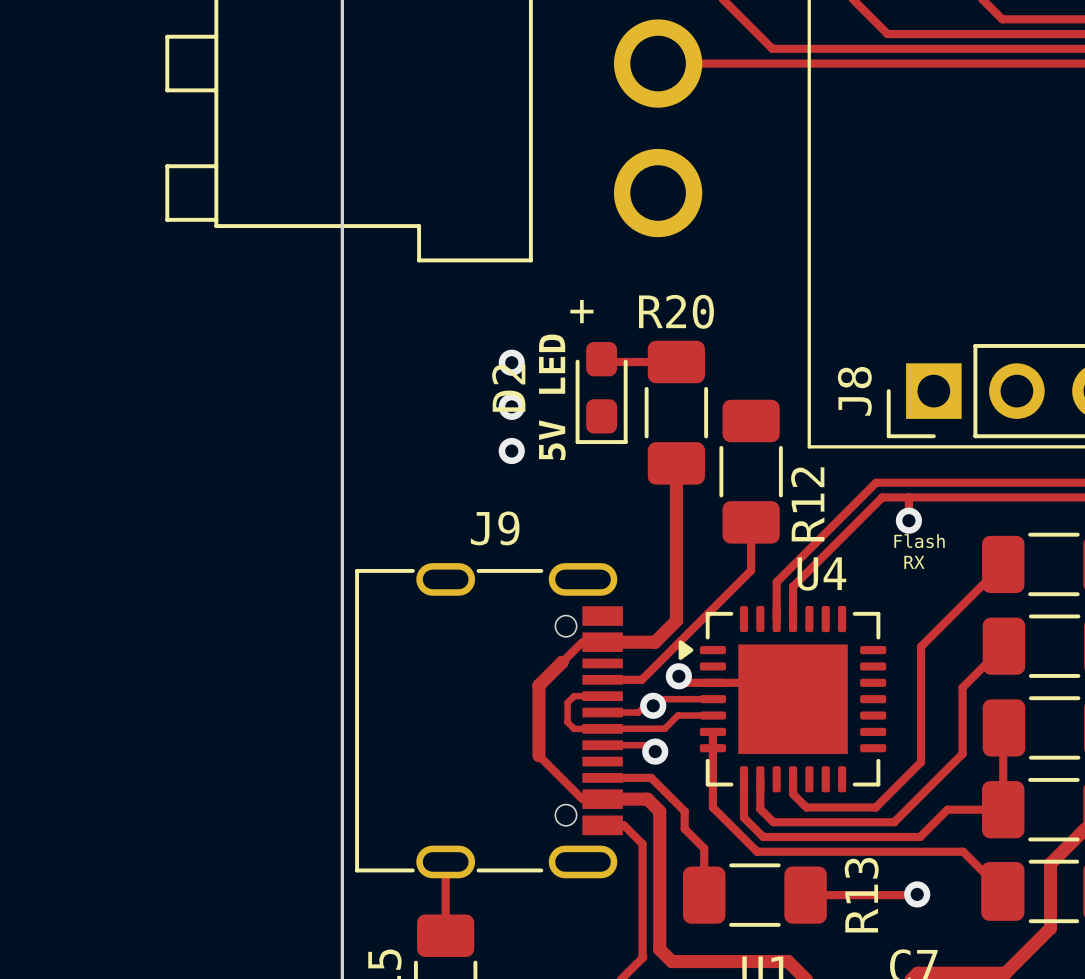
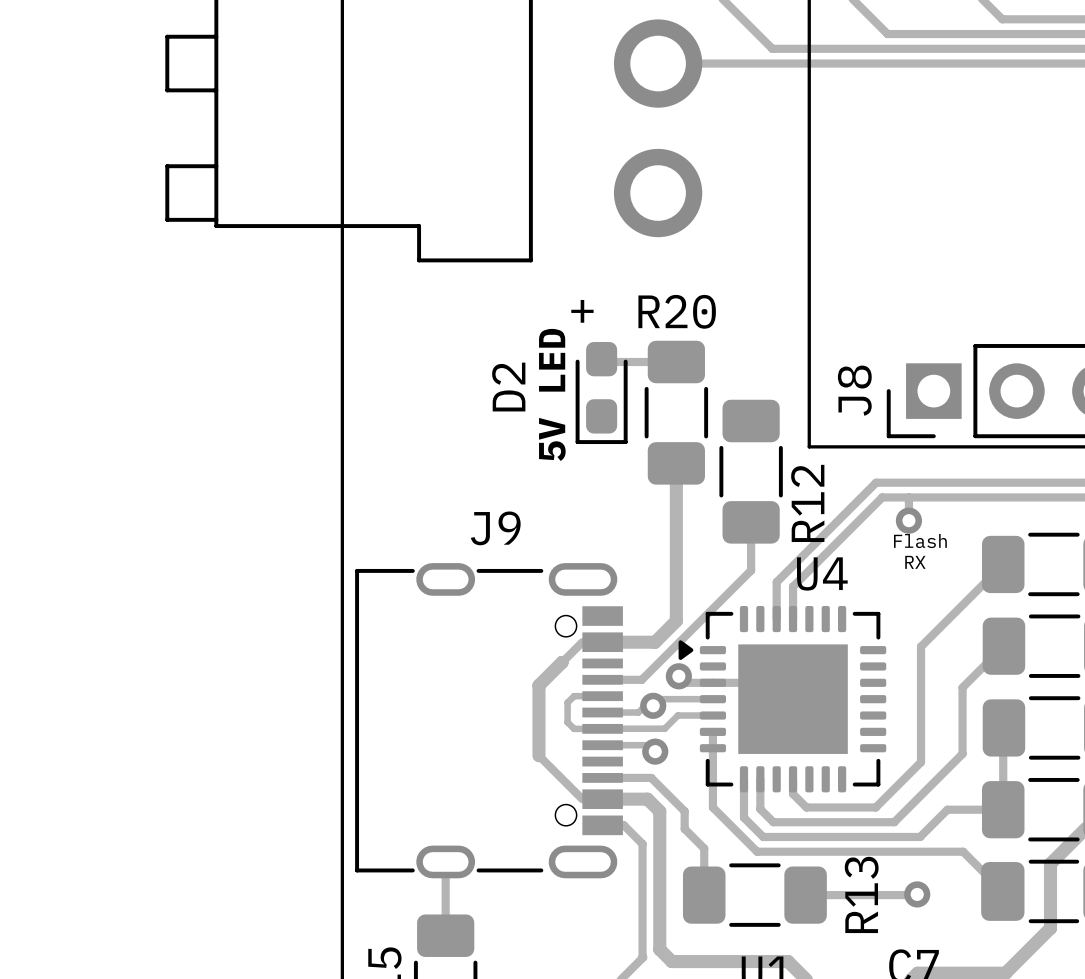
via: (511, 362) -> none
via: (511, 406) -> none
via: (511, 451) -> none

